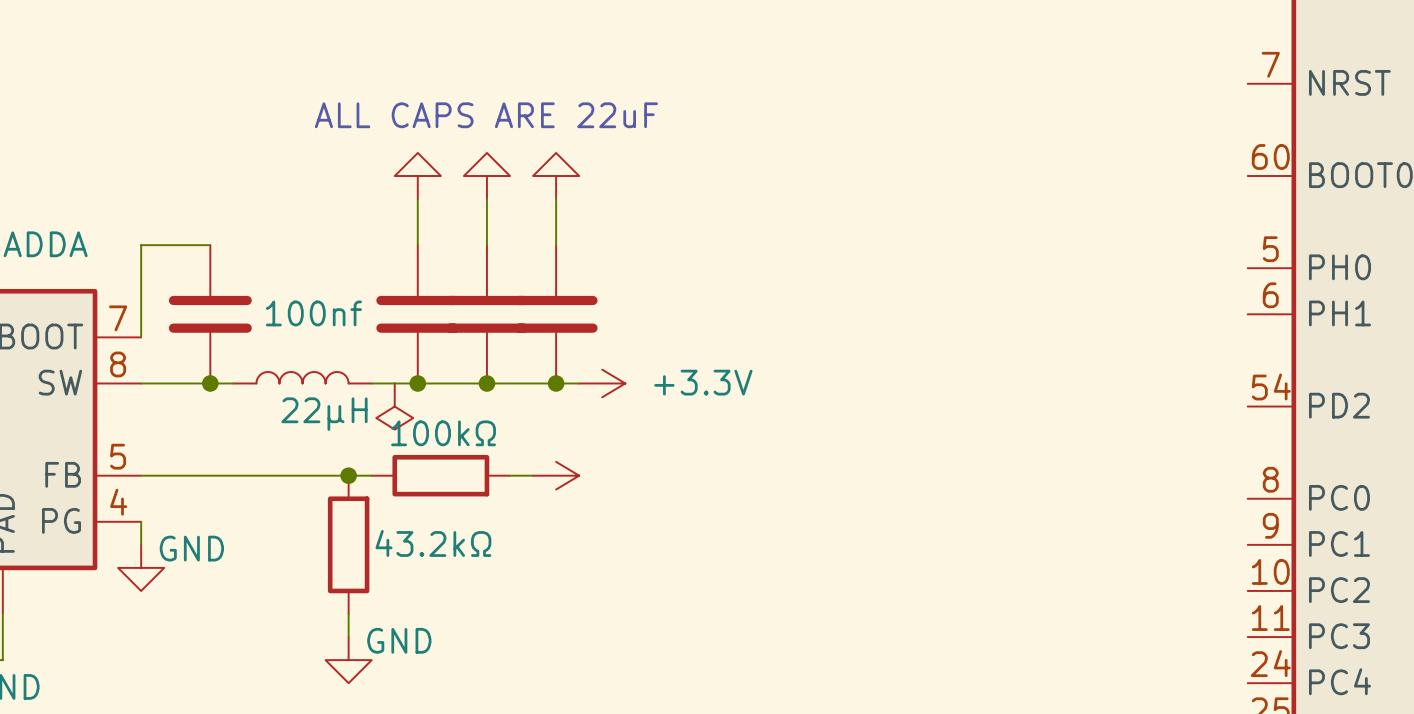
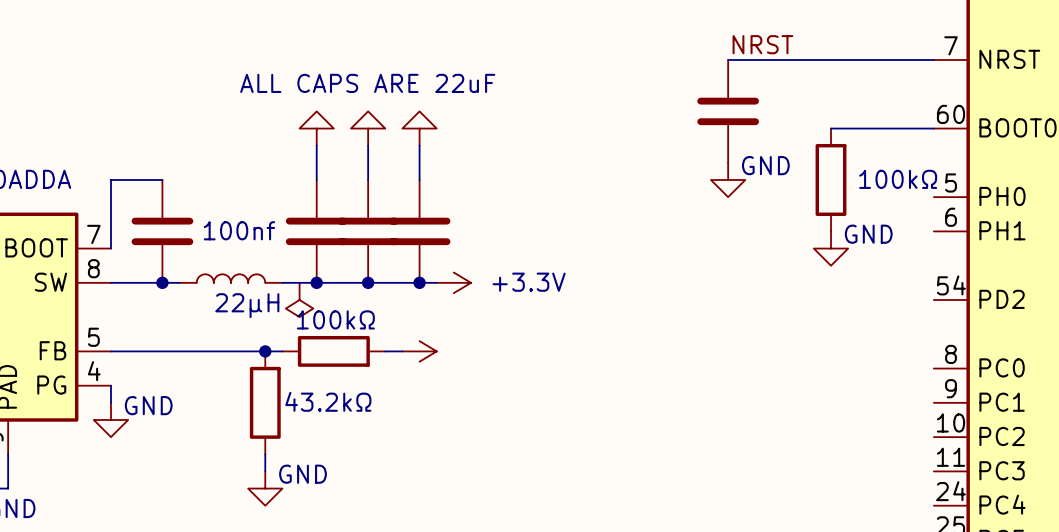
label: none -> NRST (762, 44)
wire: none -> (728, 59) (933, 59)
part: none -> (728, 111)
wire: none -> (831, 128) (933, 128)
power symbol: none -> GND (728, 179)
part: none -> 100kΩ (831, 179)
power symbol: none -> GND (831, 248)

